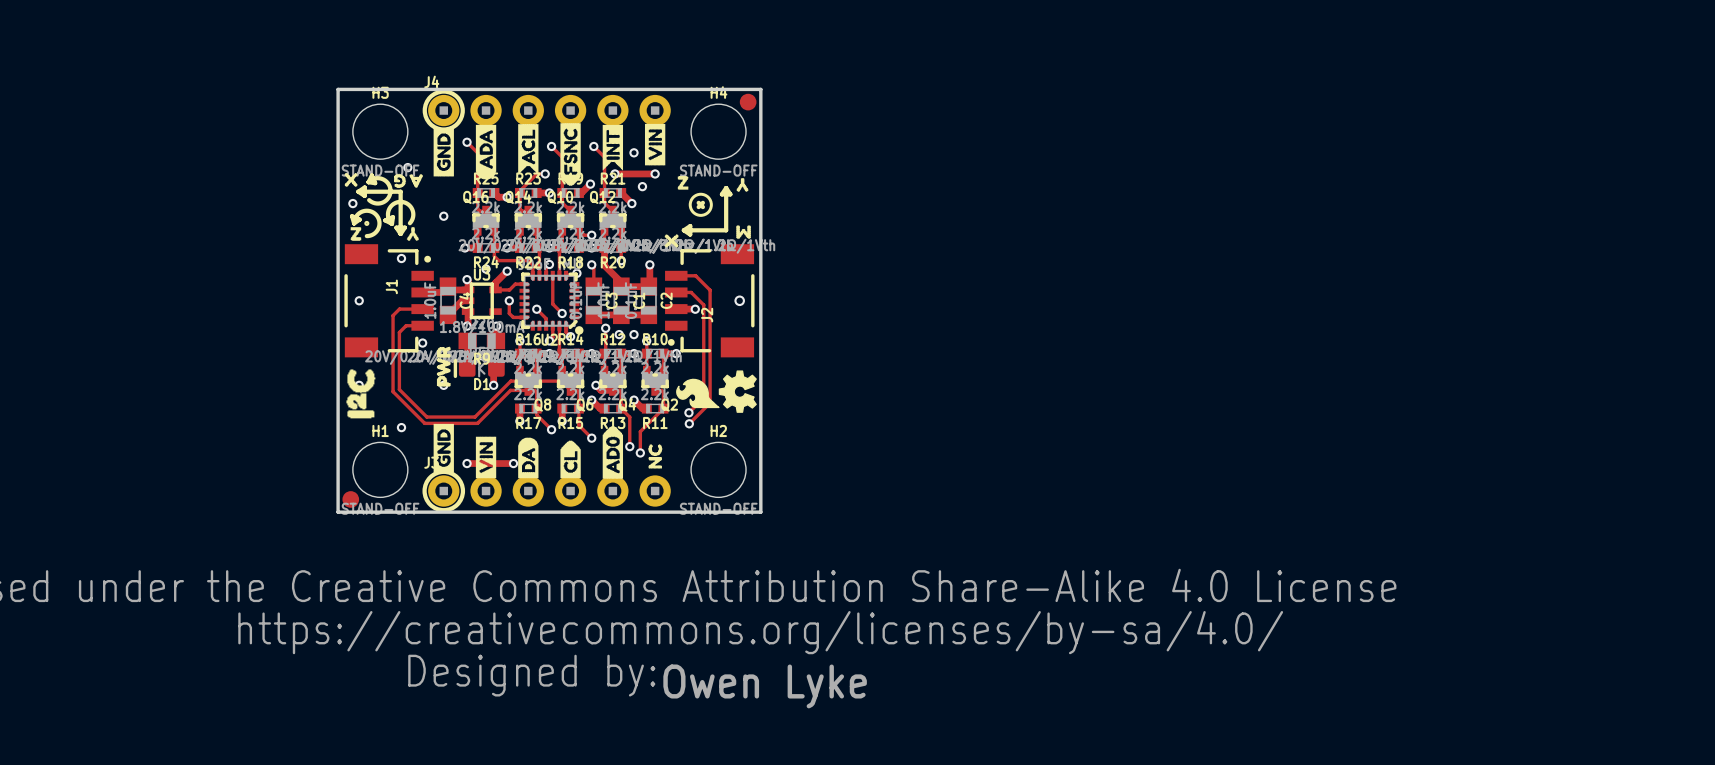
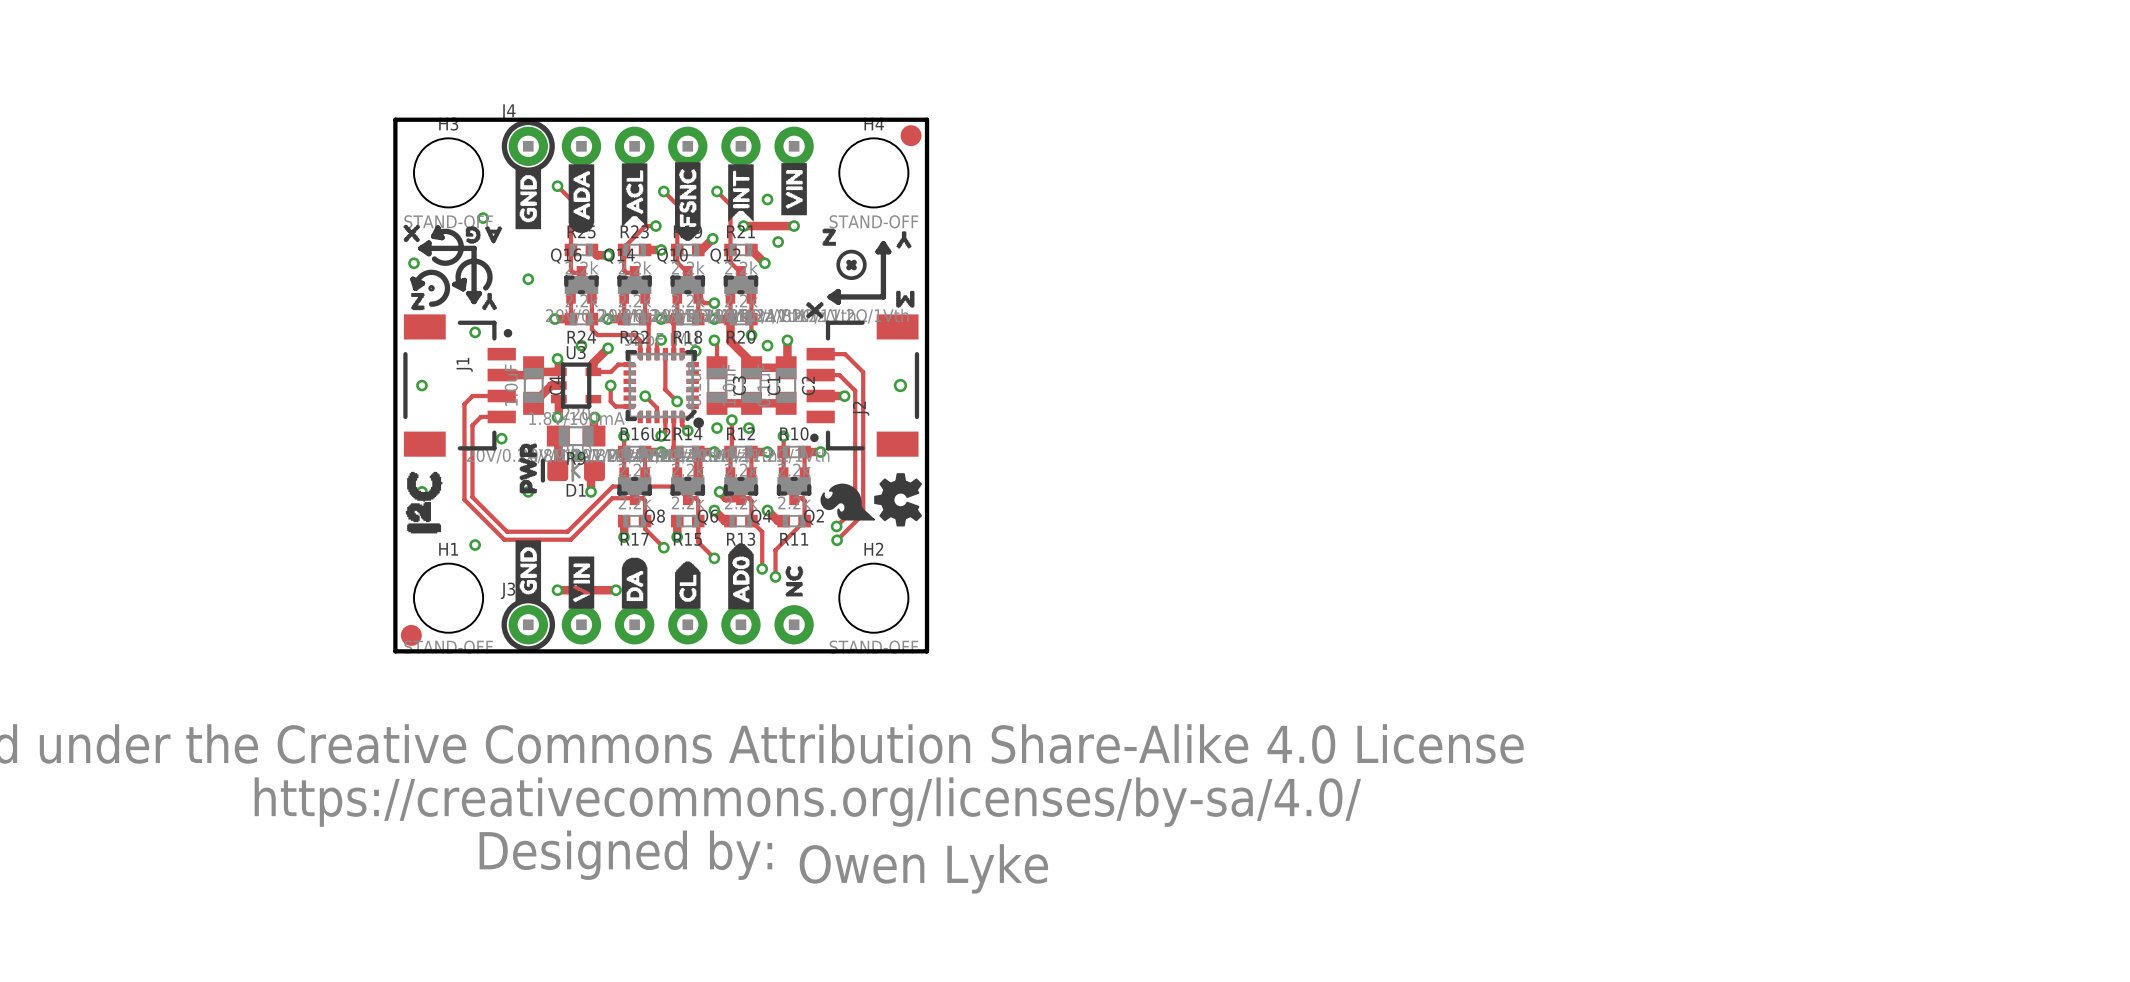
via: none -> (767, 345)
via: none -> (717, 428)
via: (634, 334) -> none

